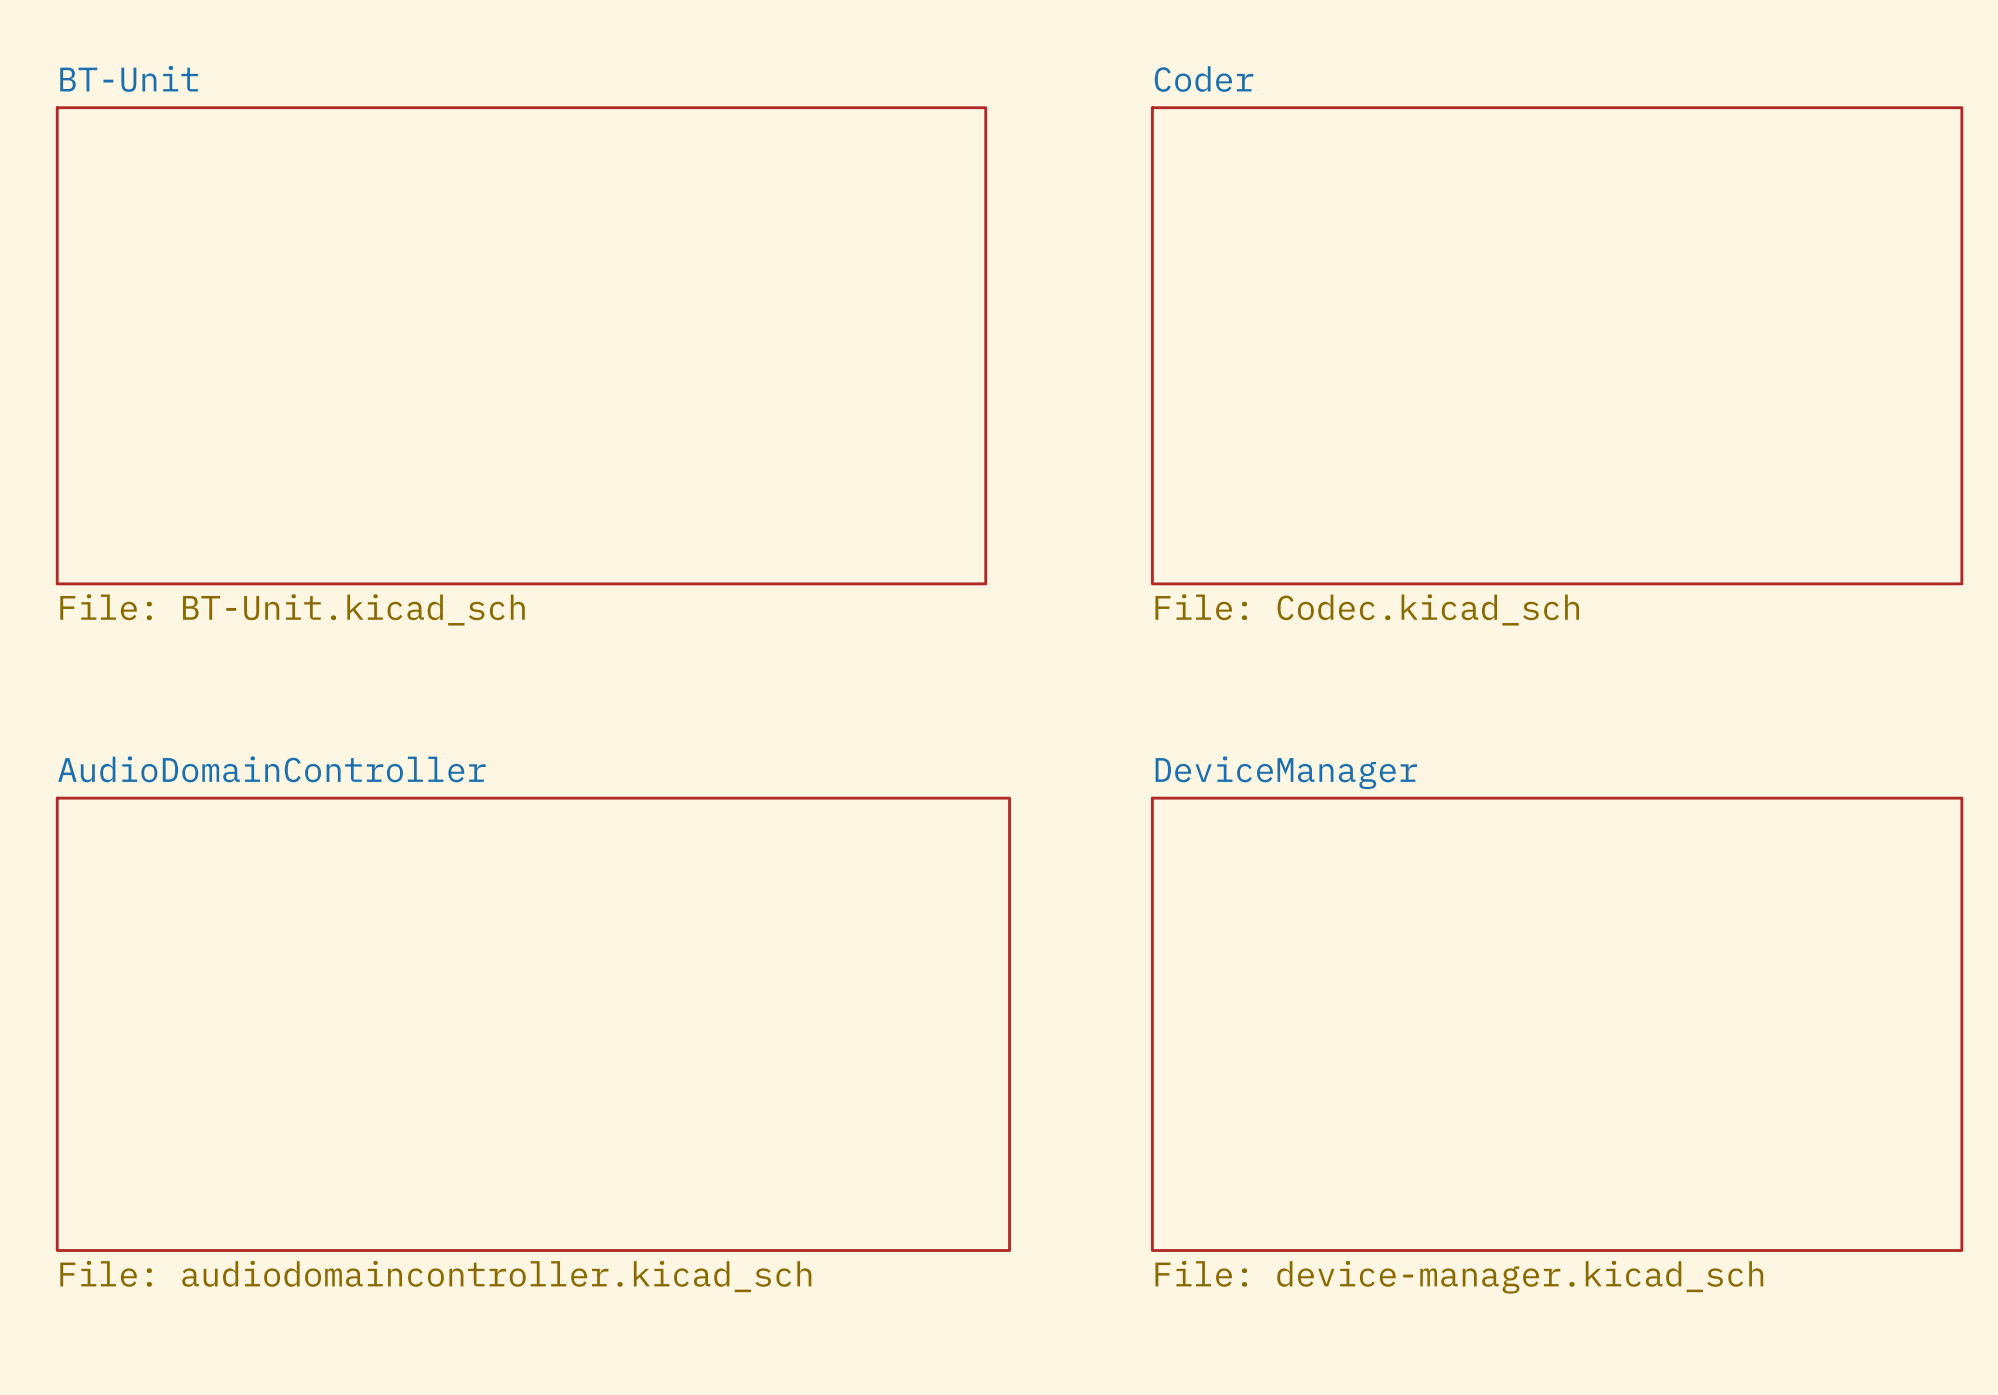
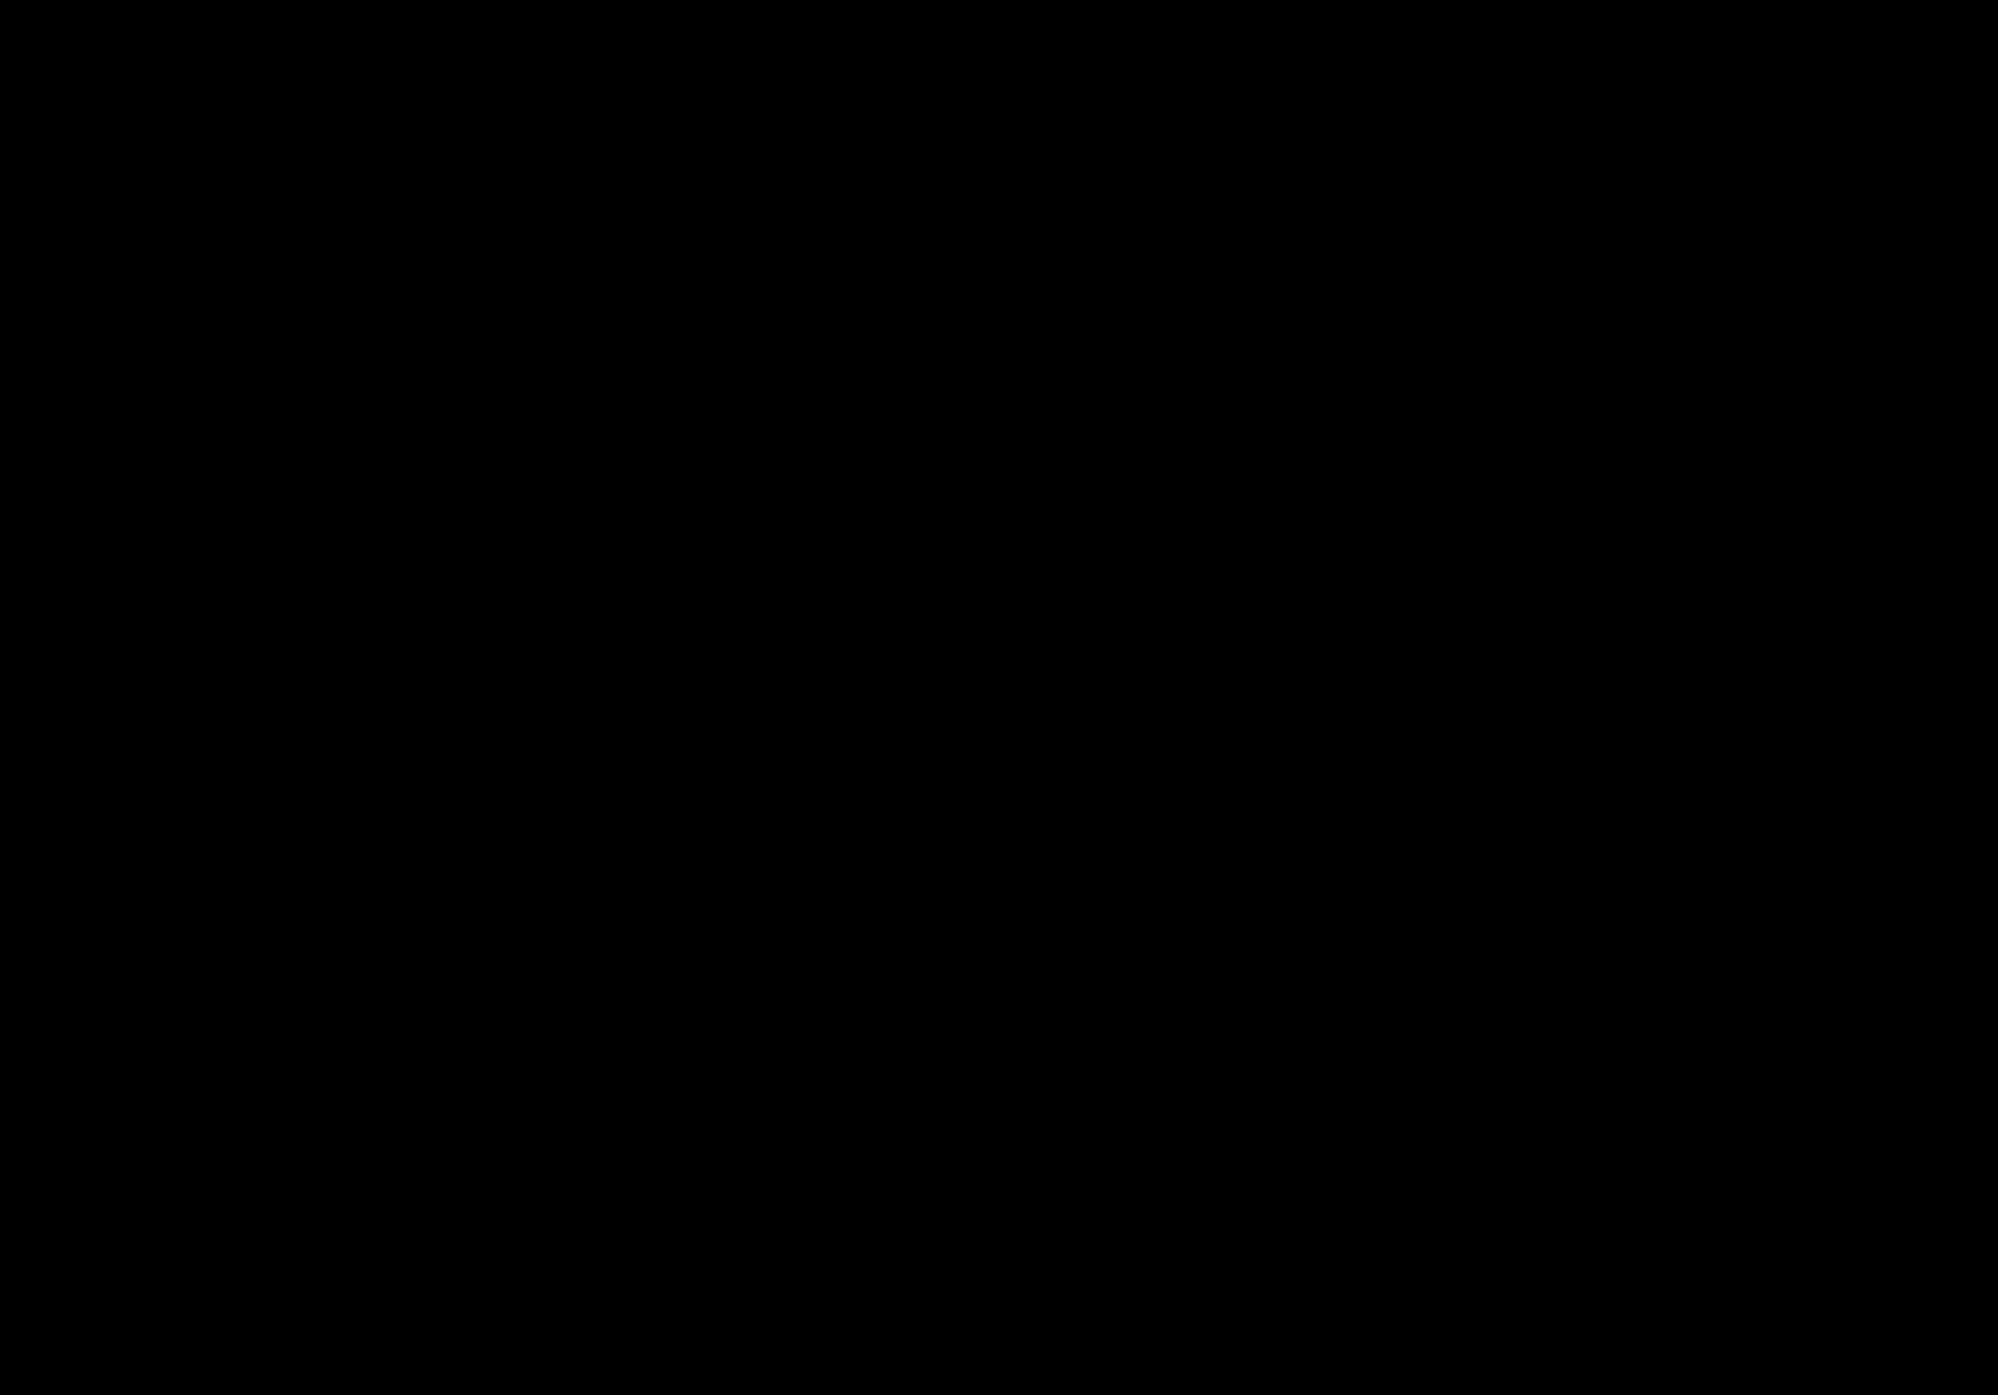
sheet BT-Unit: File: BT-Unit.kicad_sch (521, 345) -> none
sheet Coder: File: Codec.kicad_sch (1557, 345) -> none
sheet AudioDomainController: File: audiodomaincontroller.kicad_sch (533, 1024) -> none
sheet DeviceManager: File: device-manager.kicad_sch (1557, 1024) -> none

